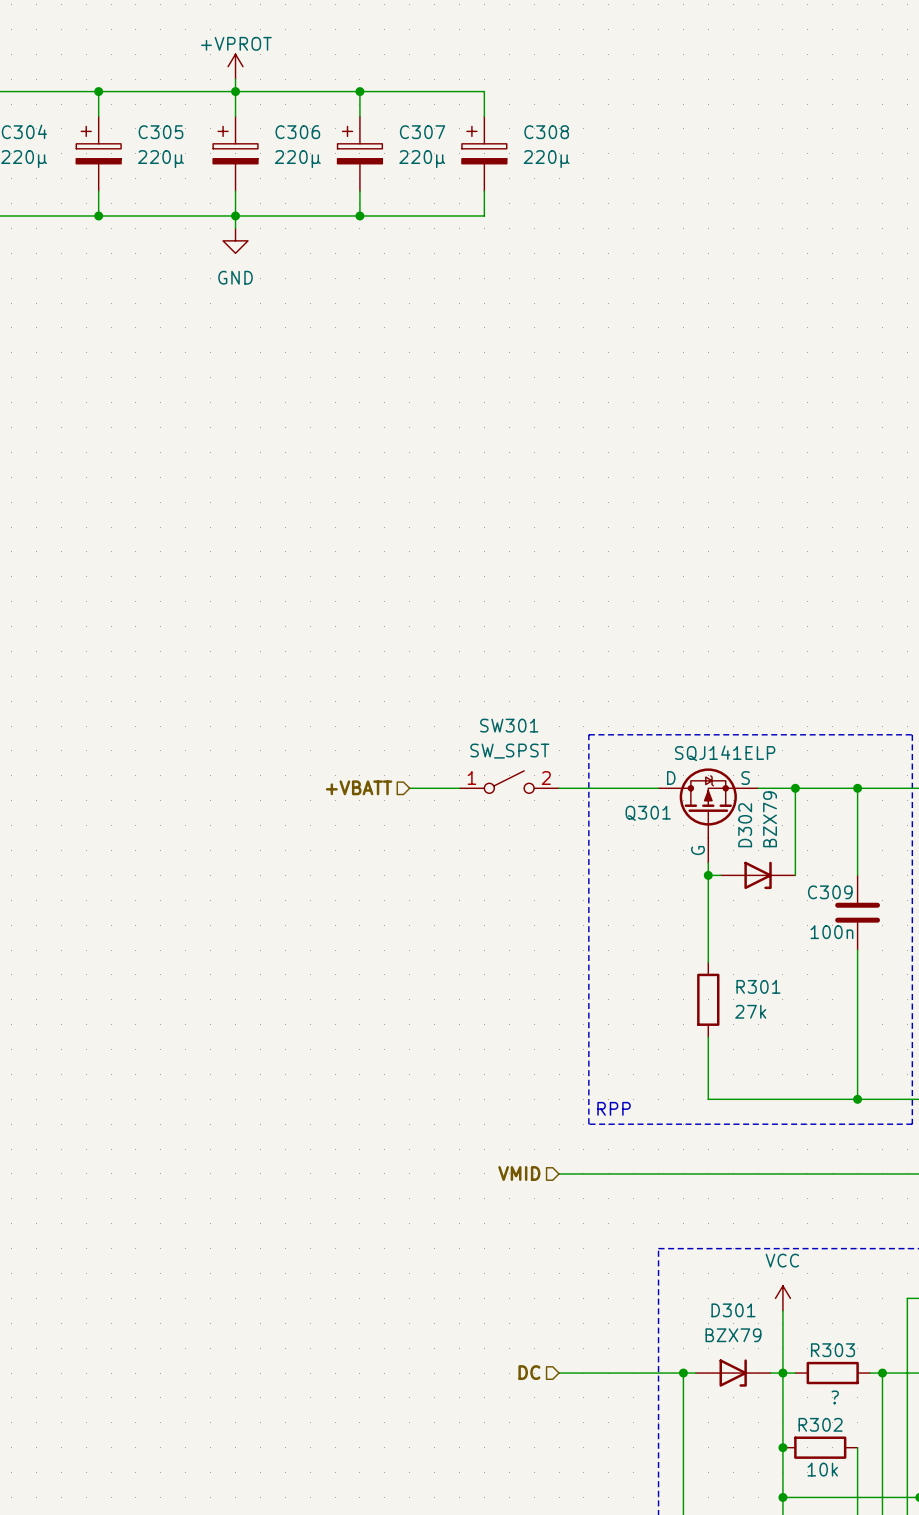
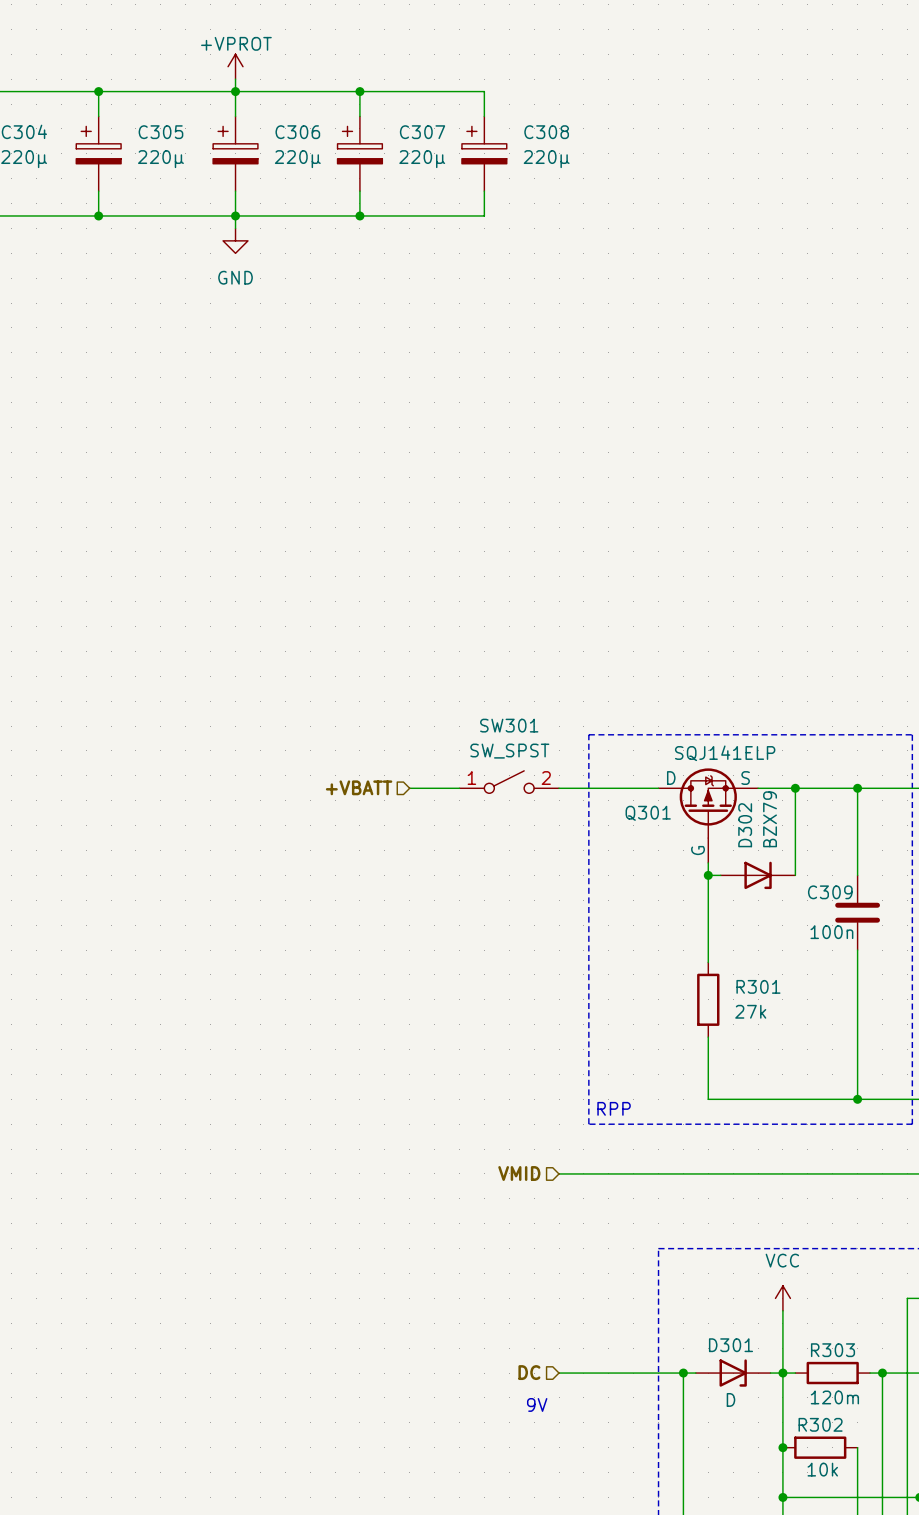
D301 name position: D301 (733, 1310) -> D301 (730, 1345)
D301 value: BZX79 (733, 1335) -> D (730, 1399)
R303 value: ? (835, 1397) -> 120m (834, 1397)
text: none -> 9V (537, 1404)

